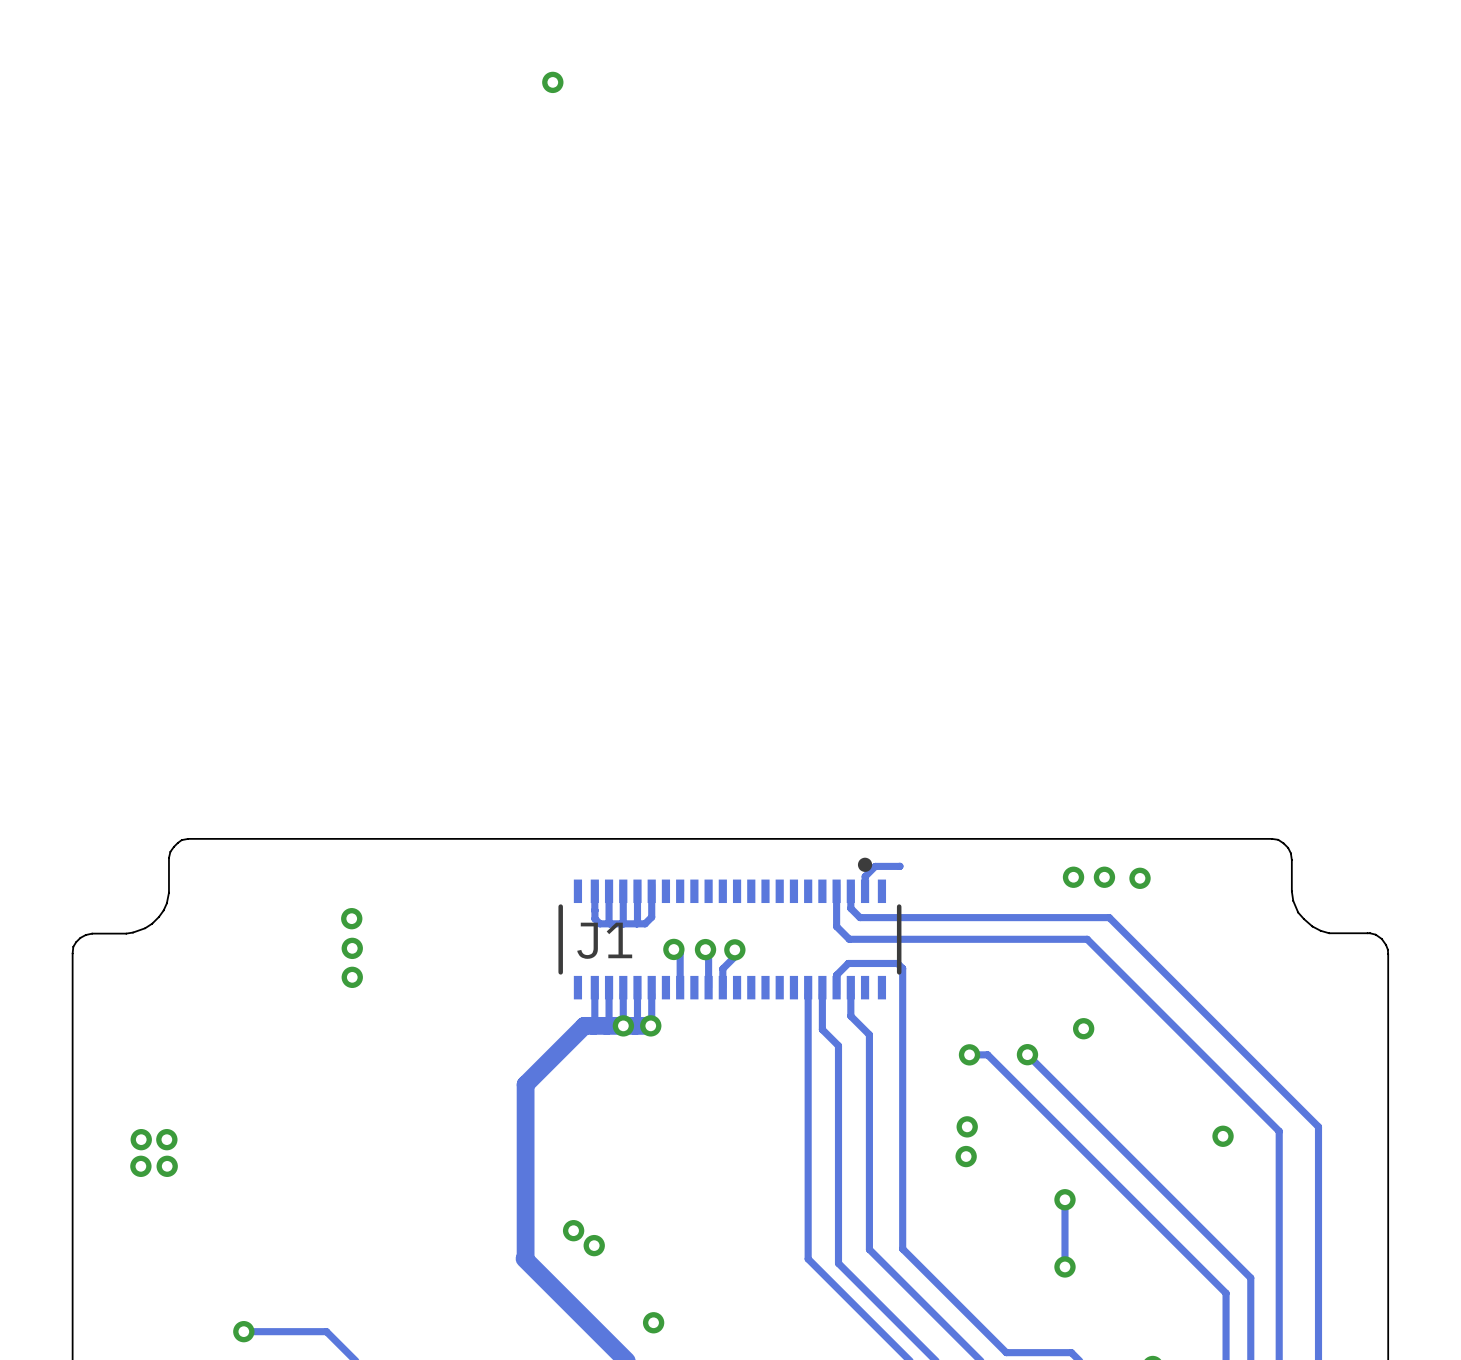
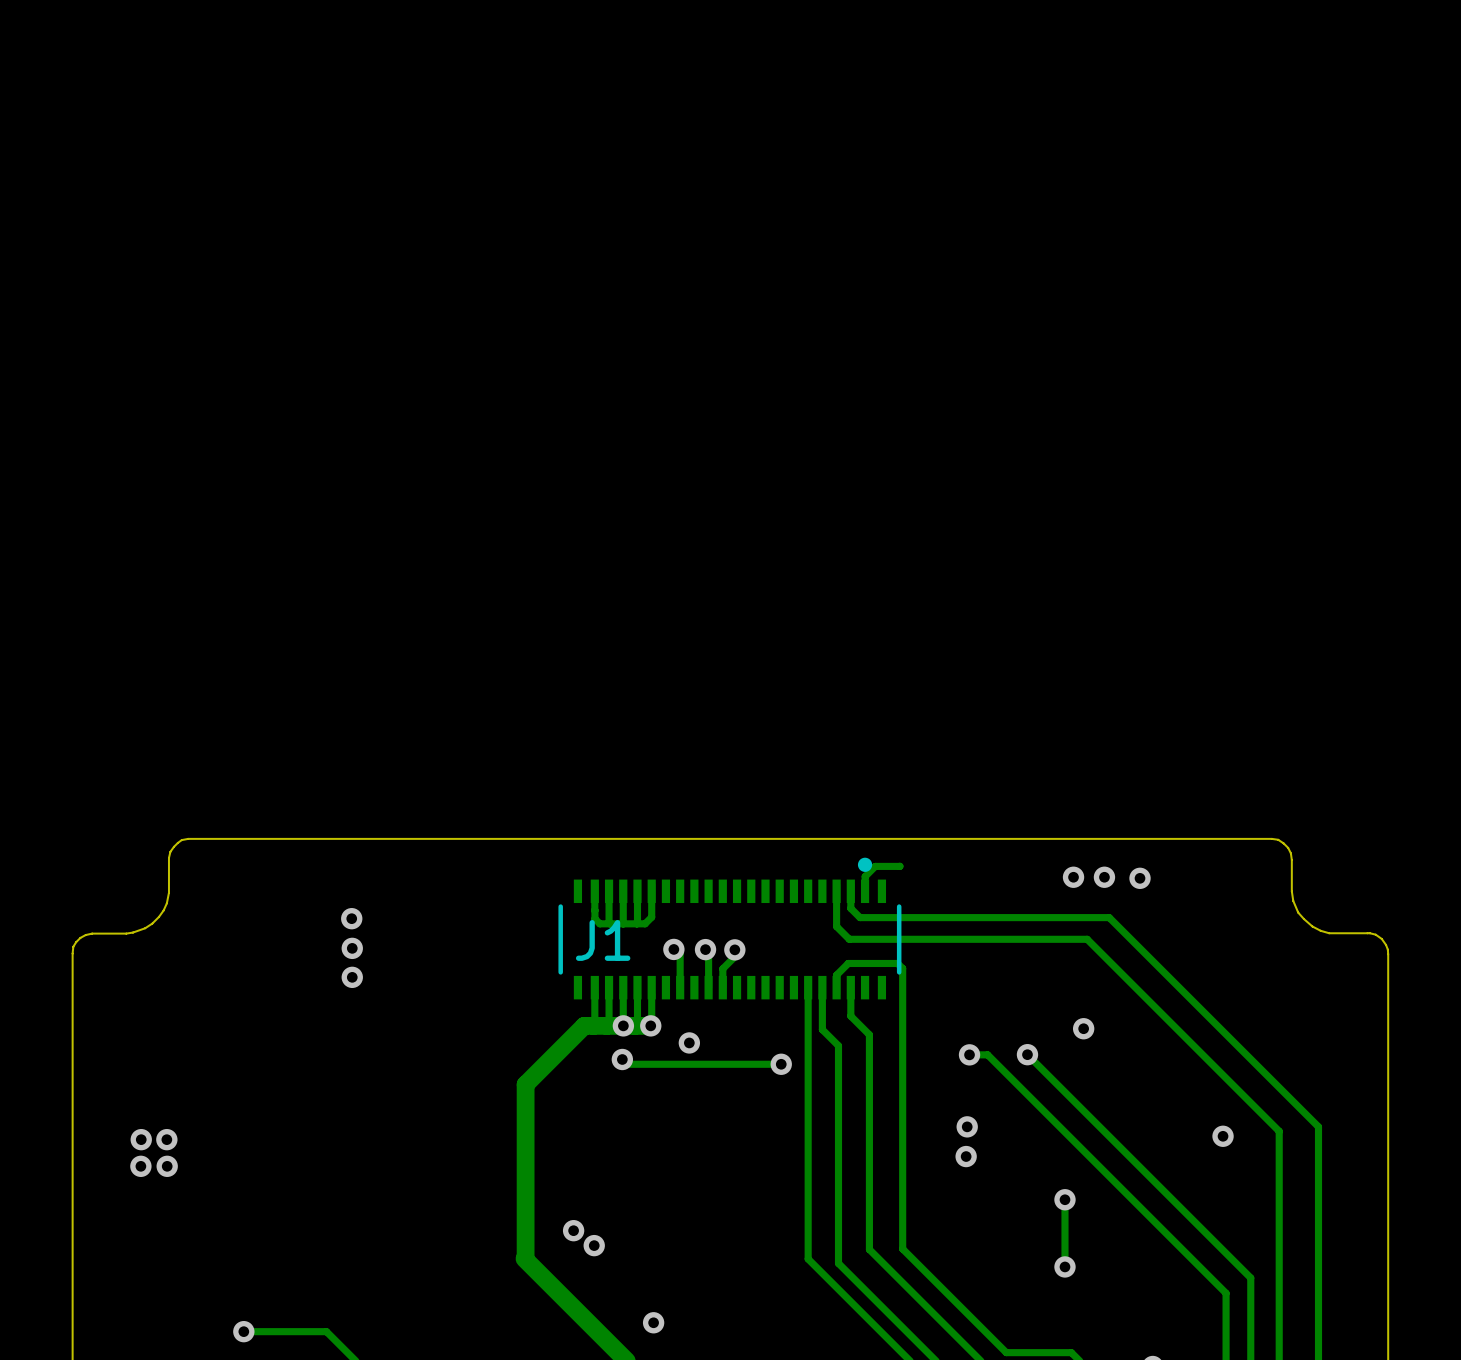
via: (552, 82) -> none
via: none -> (689, 1042)
track: none -> (622, 1059) (627, 1064) (781, 1064)
via: none -> (622, 1059)
via: none -> (781, 1064)

